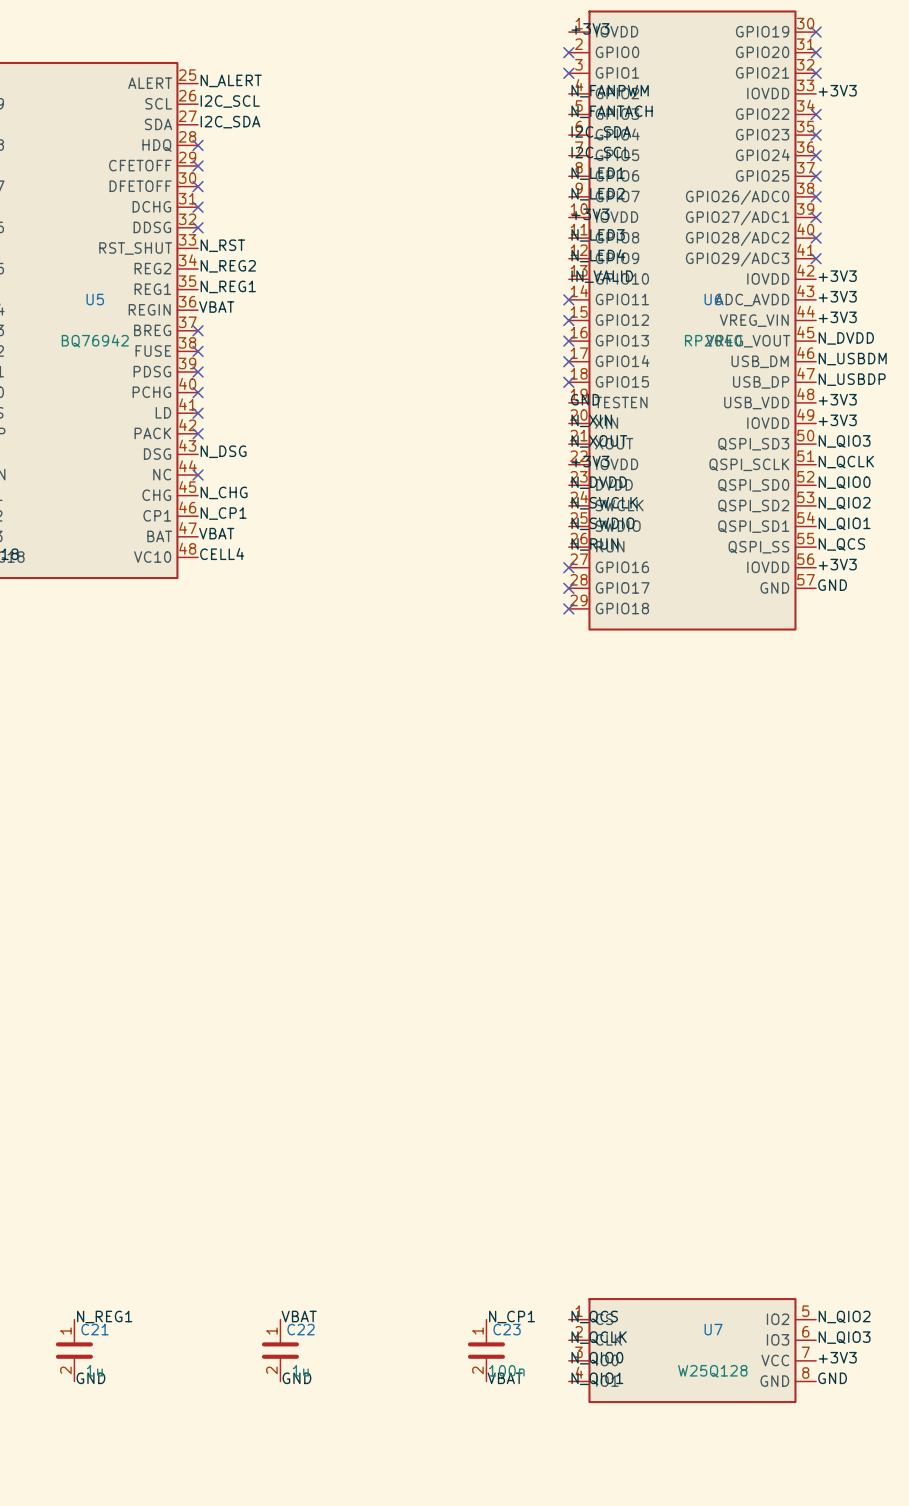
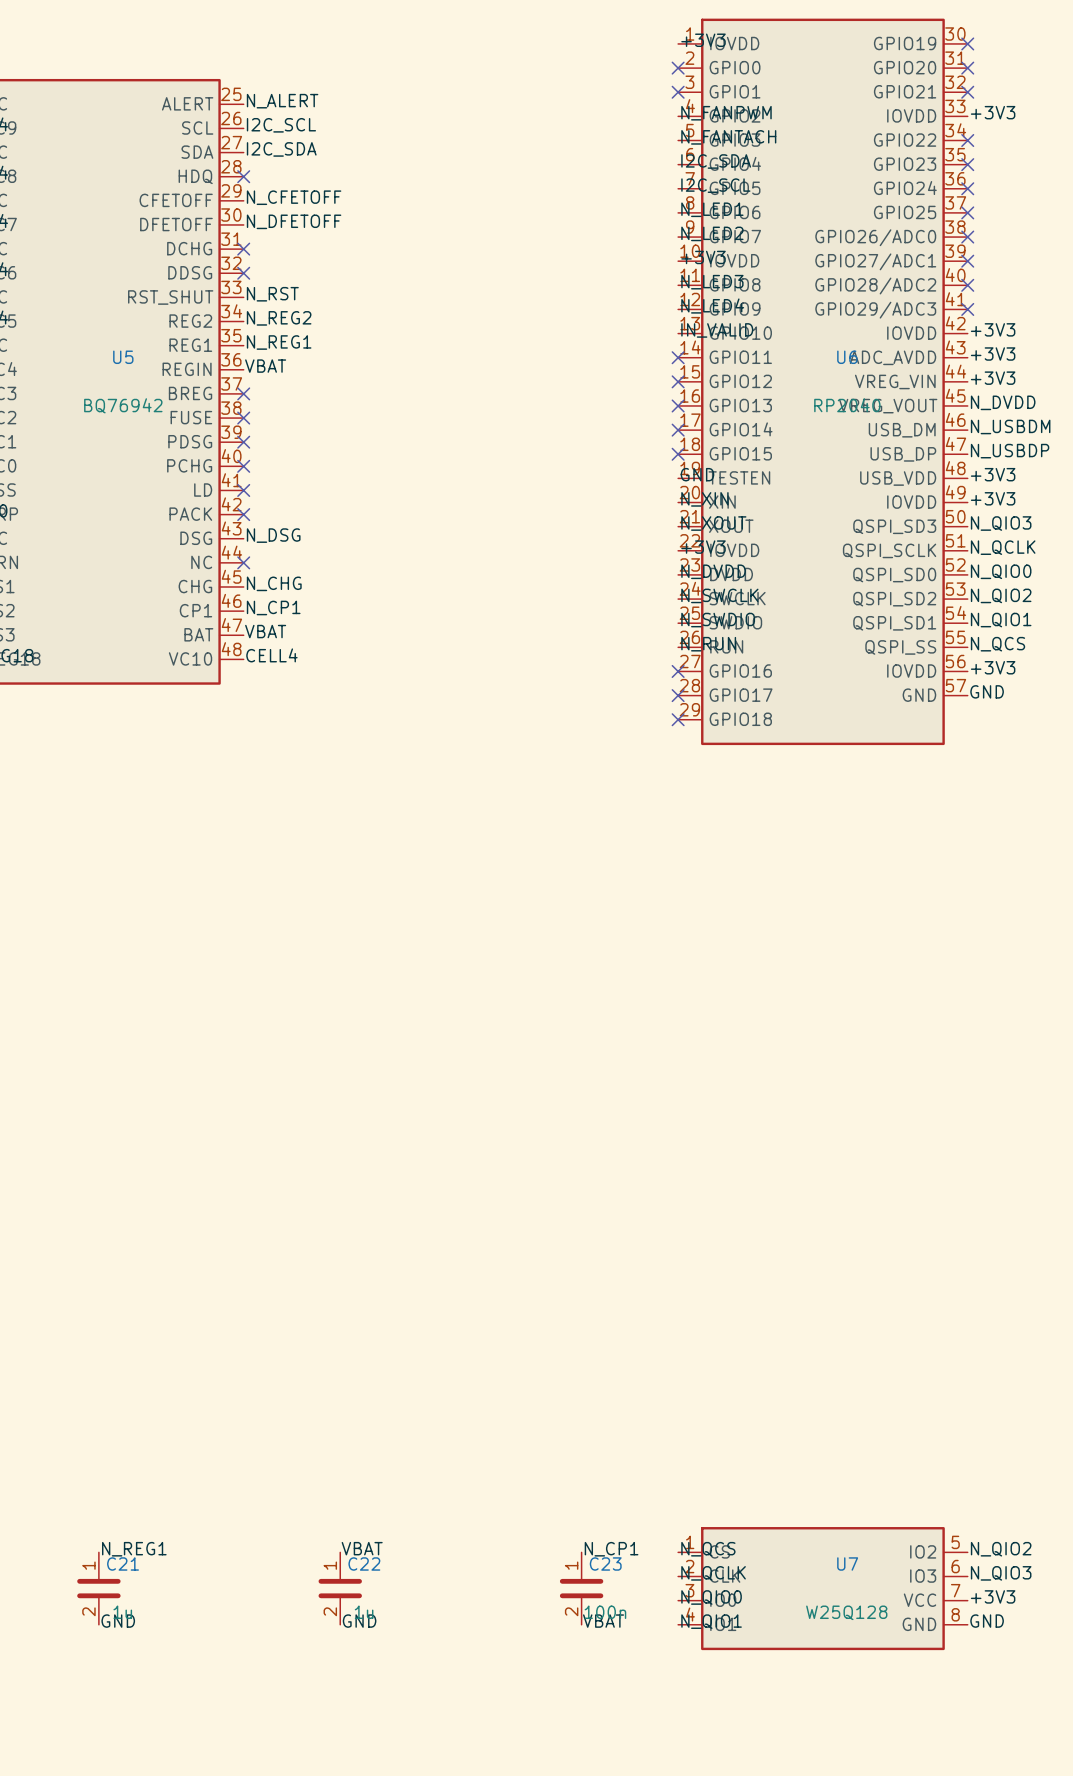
label: none -> N_CFETOFF (294, 197)
no-connect mark: (198, 165) -> none
label: none -> N_DFETOFF (294, 221)
no-connect mark: (198, 186) -> none

